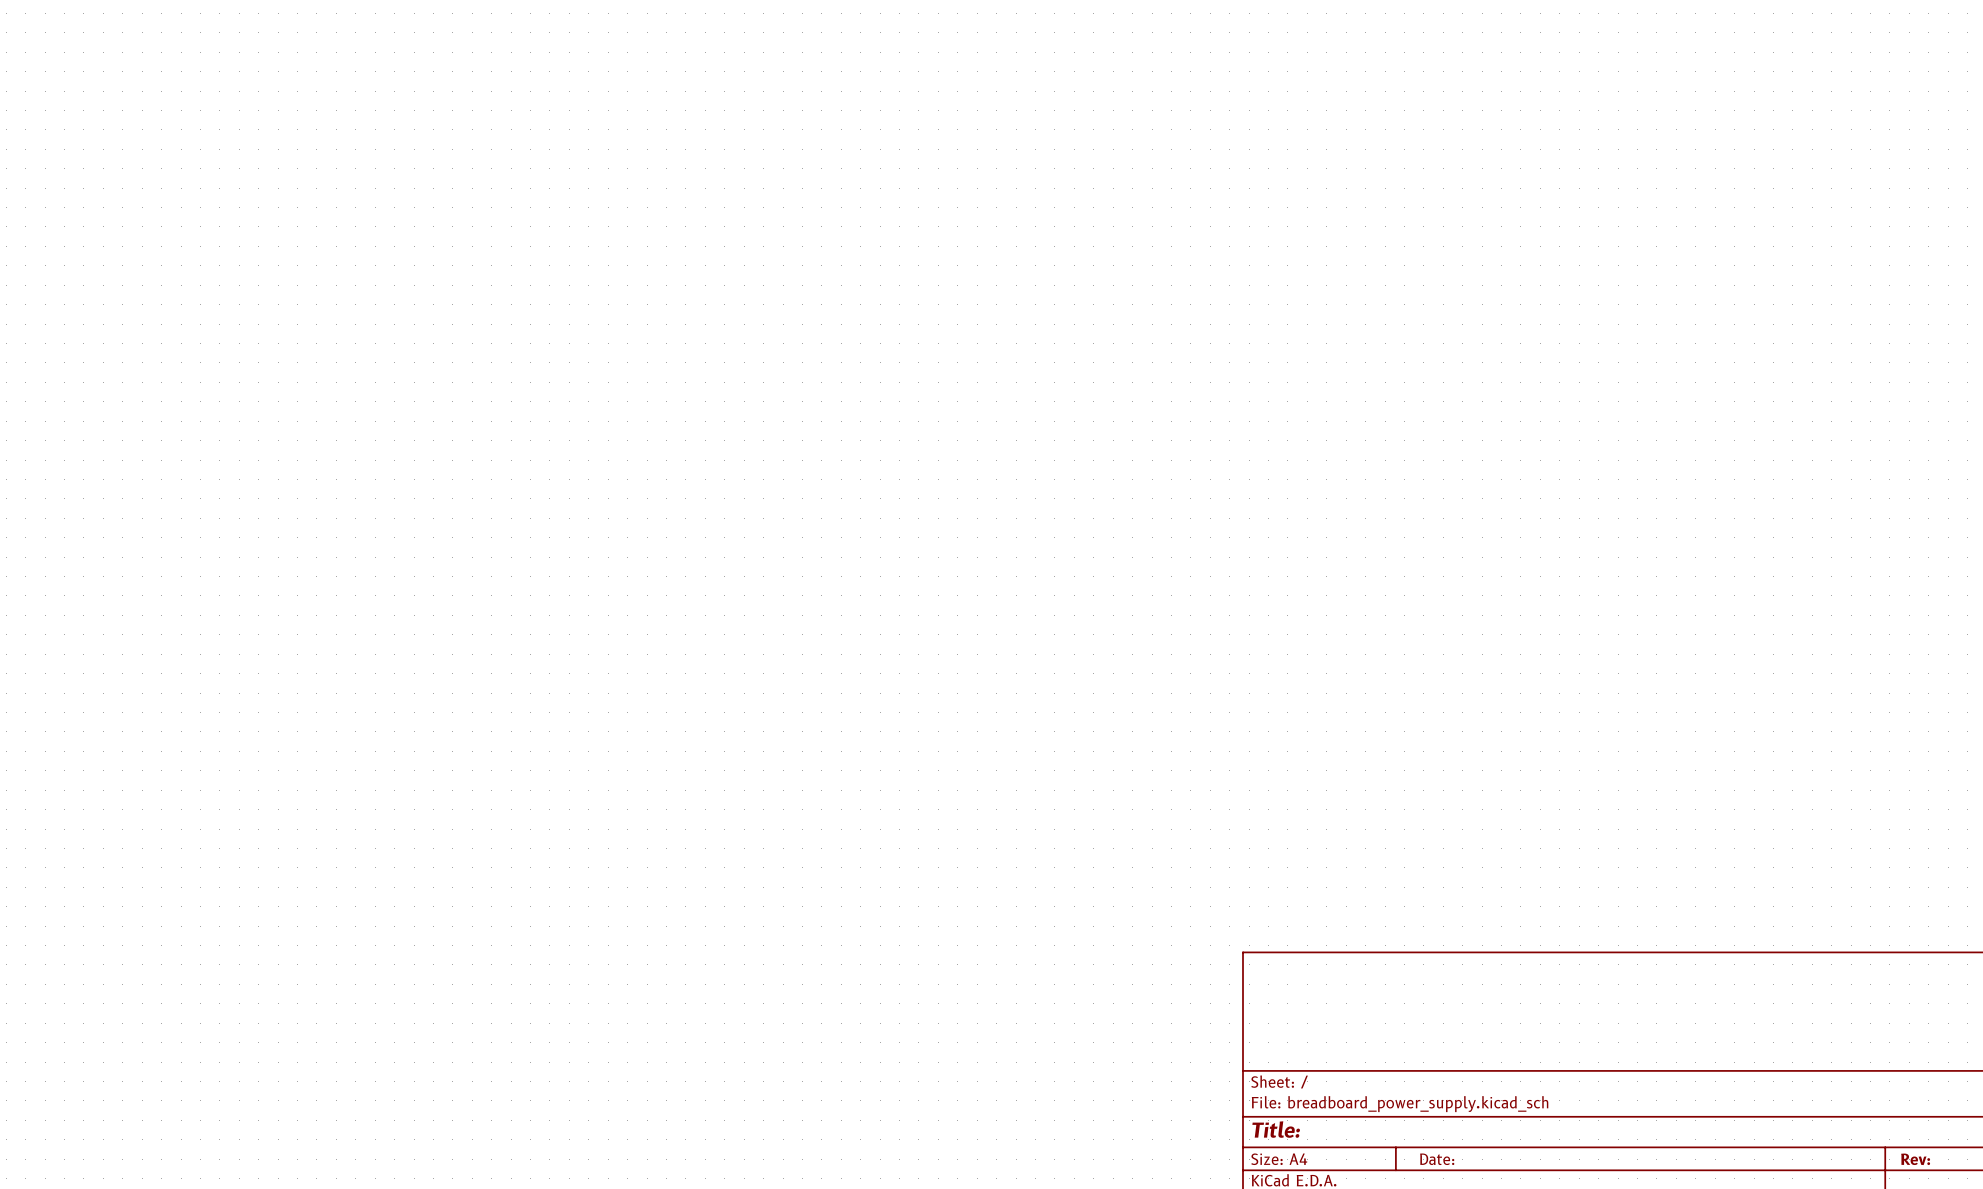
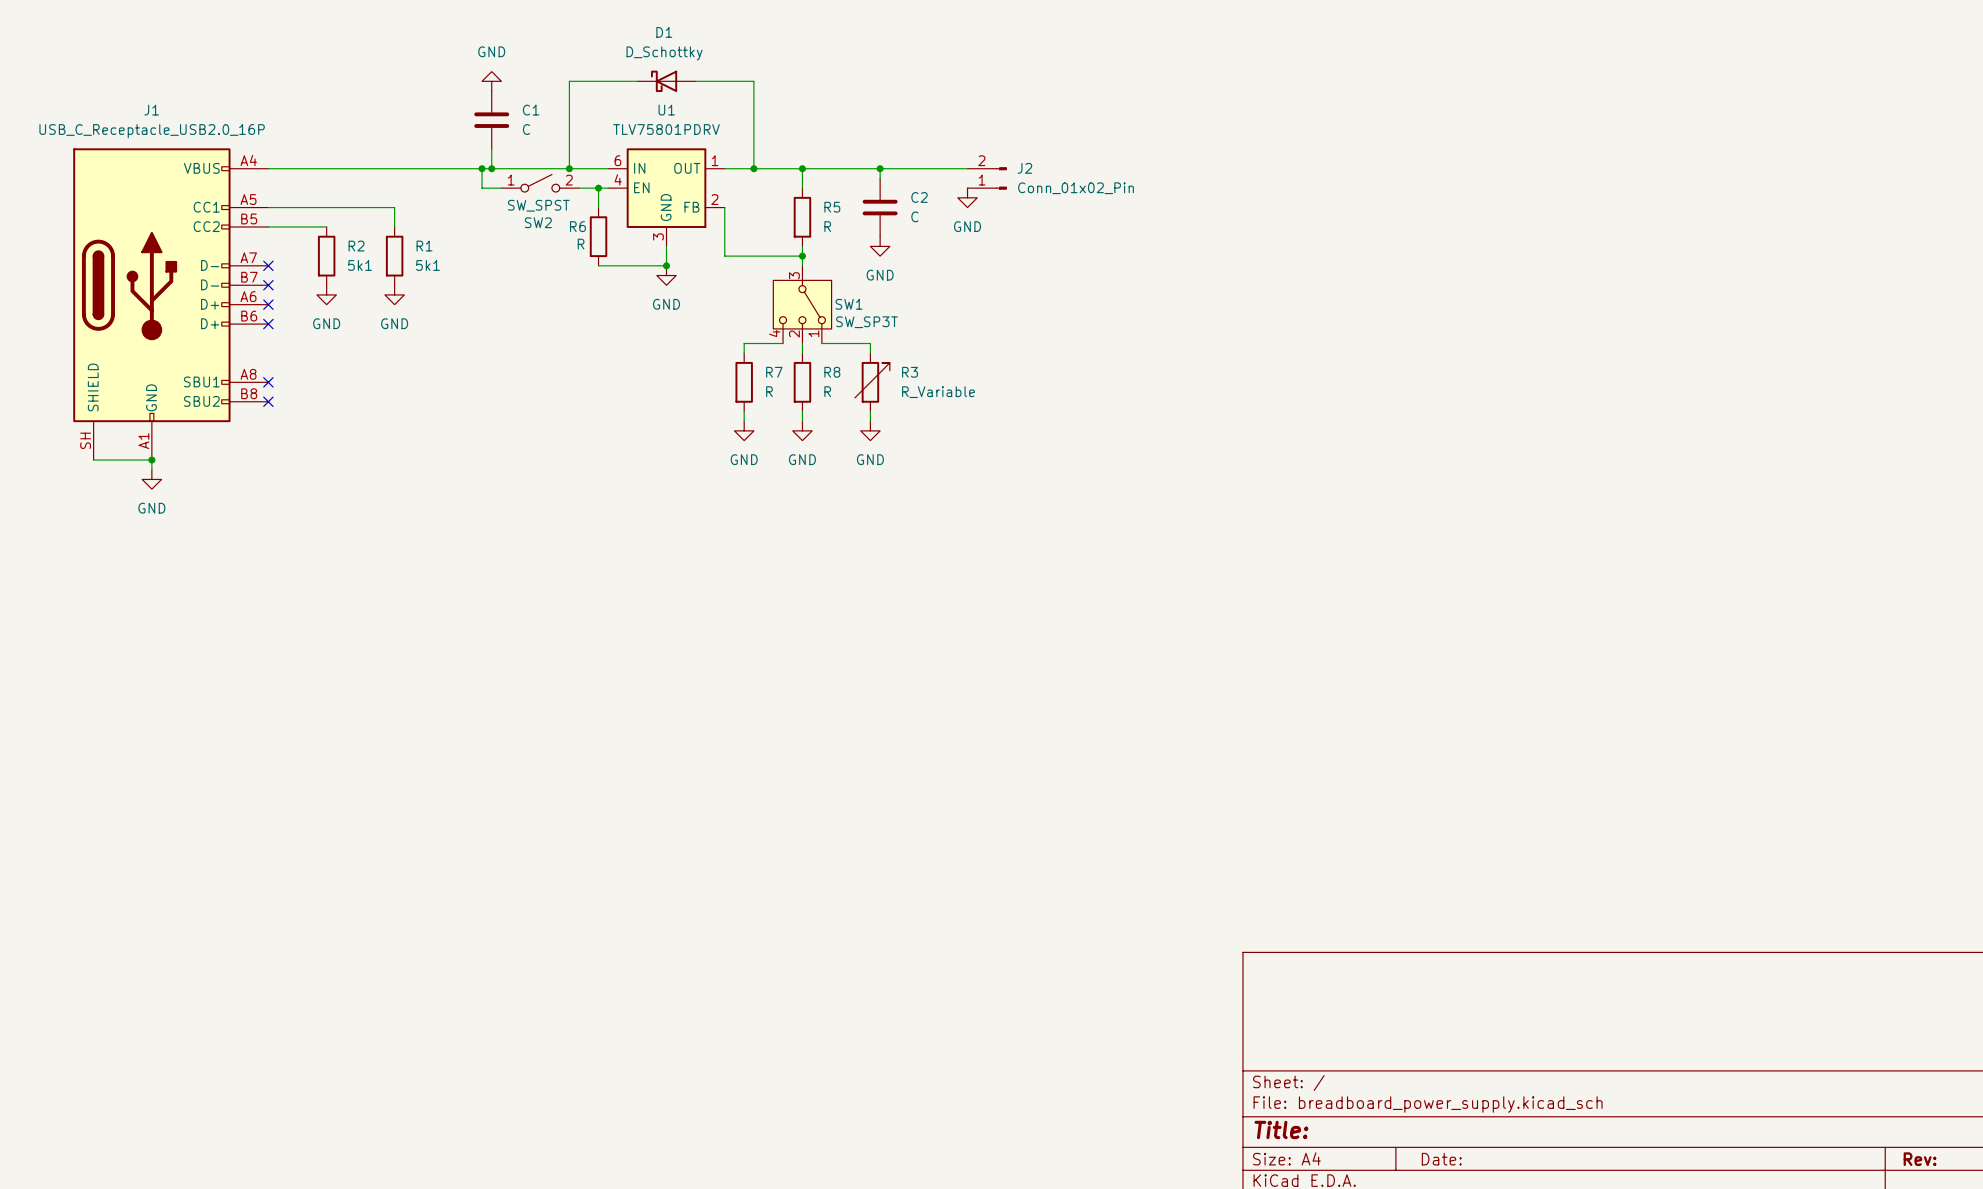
power symbol: none -> GND (491, 81)
wire: none -> (637, 81) (569, 81) (569, 168)
D1: none -> D_Schottky (666, 81)
wire: none -> (695, 81) (753, 81) (753, 168)
C1: none -> C (491, 120)
wire: none -> (491, 149) (491, 168)
wire: none -> (268, 168) (608, 168)
wire: none -> (482, 168) (482, 188) (501, 188)
junction: none -> (482, 168)
junction: none -> (491, 168)
junction: none -> (569, 168)
wire: none -> (724, 168) (967, 168)
junction: none -> (753, 168)
wire: none -> (802, 168) (802, 188)
junction: none -> (802, 168)
wire: none -> (880, 168) (880, 178)
junction: none -> (880, 168)
J2: none -> Conn_01x02_Pin (987, 178)
SW2: none -> SW_SPST (540, 183)
wire: none -> (579, 188) (608, 188)
wire: none -> (598, 188) (598, 207)
junction: none -> (598, 188)
U1: none -> TLV75801PDRV (666, 197)
power symbol: none -> GND (967, 197)
wire: none -> (268, 207) (394, 207) (394, 226)
wire: none -> (724, 207) (724, 256) (802, 256)
C2: none -> C (880, 207)
R5: none -> R (802, 217)
wire: none -> (268, 226) (326, 226)
R6: none -> R (598, 236)
wire: none -> (666, 246) (666, 265) (598, 265)
wire: none -> (802, 246) (802, 265)
power symbol: none -> GND (880, 246)
R2: none -> 5k1 (326, 256)
R1: none -> 5k1 (394, 256)
junction: none -> (802, 256)
no-connect mark: none -> (268, 265)
junction: none -> (666, 265)
power symbol: none -> GND (666, 275)
no-connect mark: none -> (268, 285)
power symbol: none -> GND (326, 294)
power symbol: none -> GND (394, 294)
J1: none -> USB_C_Receptacle_USB2.0_16P (170, 304)
no-connect mark: none -> (268, 304)
SW1: none -> SW_SP3T (802, 304)
no-connect mark: none -> (268, 324)
wire: none -> (783, 343) (744, 343) (744, 353)
wire: none -> (802, 343) (802, 353)
wire: none -> (821, 343) (870, 343) (870, 353)
no-connect mark: none -> (268, 382)
R7: none -> R (744, 382)
R8: none -> R (802, 382)
R3: none -> R_Variable (872, 382)
no-connect mark: none -> (268, 401)
wire: none -> (744, 411) (744, 421)
wire: none -> (802, 411) (802, 421)
wire: none -> (870, 411) (870, 421)
power symbol: none -> GND (744, 430)
power symbol: none -> GND (802, 430)
power symbol: none -> GND (870, 430)
wire: none -> (93, 460) (151, 460) (151, 469)
junction: none -> (151, 460)
power symbol: none -> GND (151, 479)

